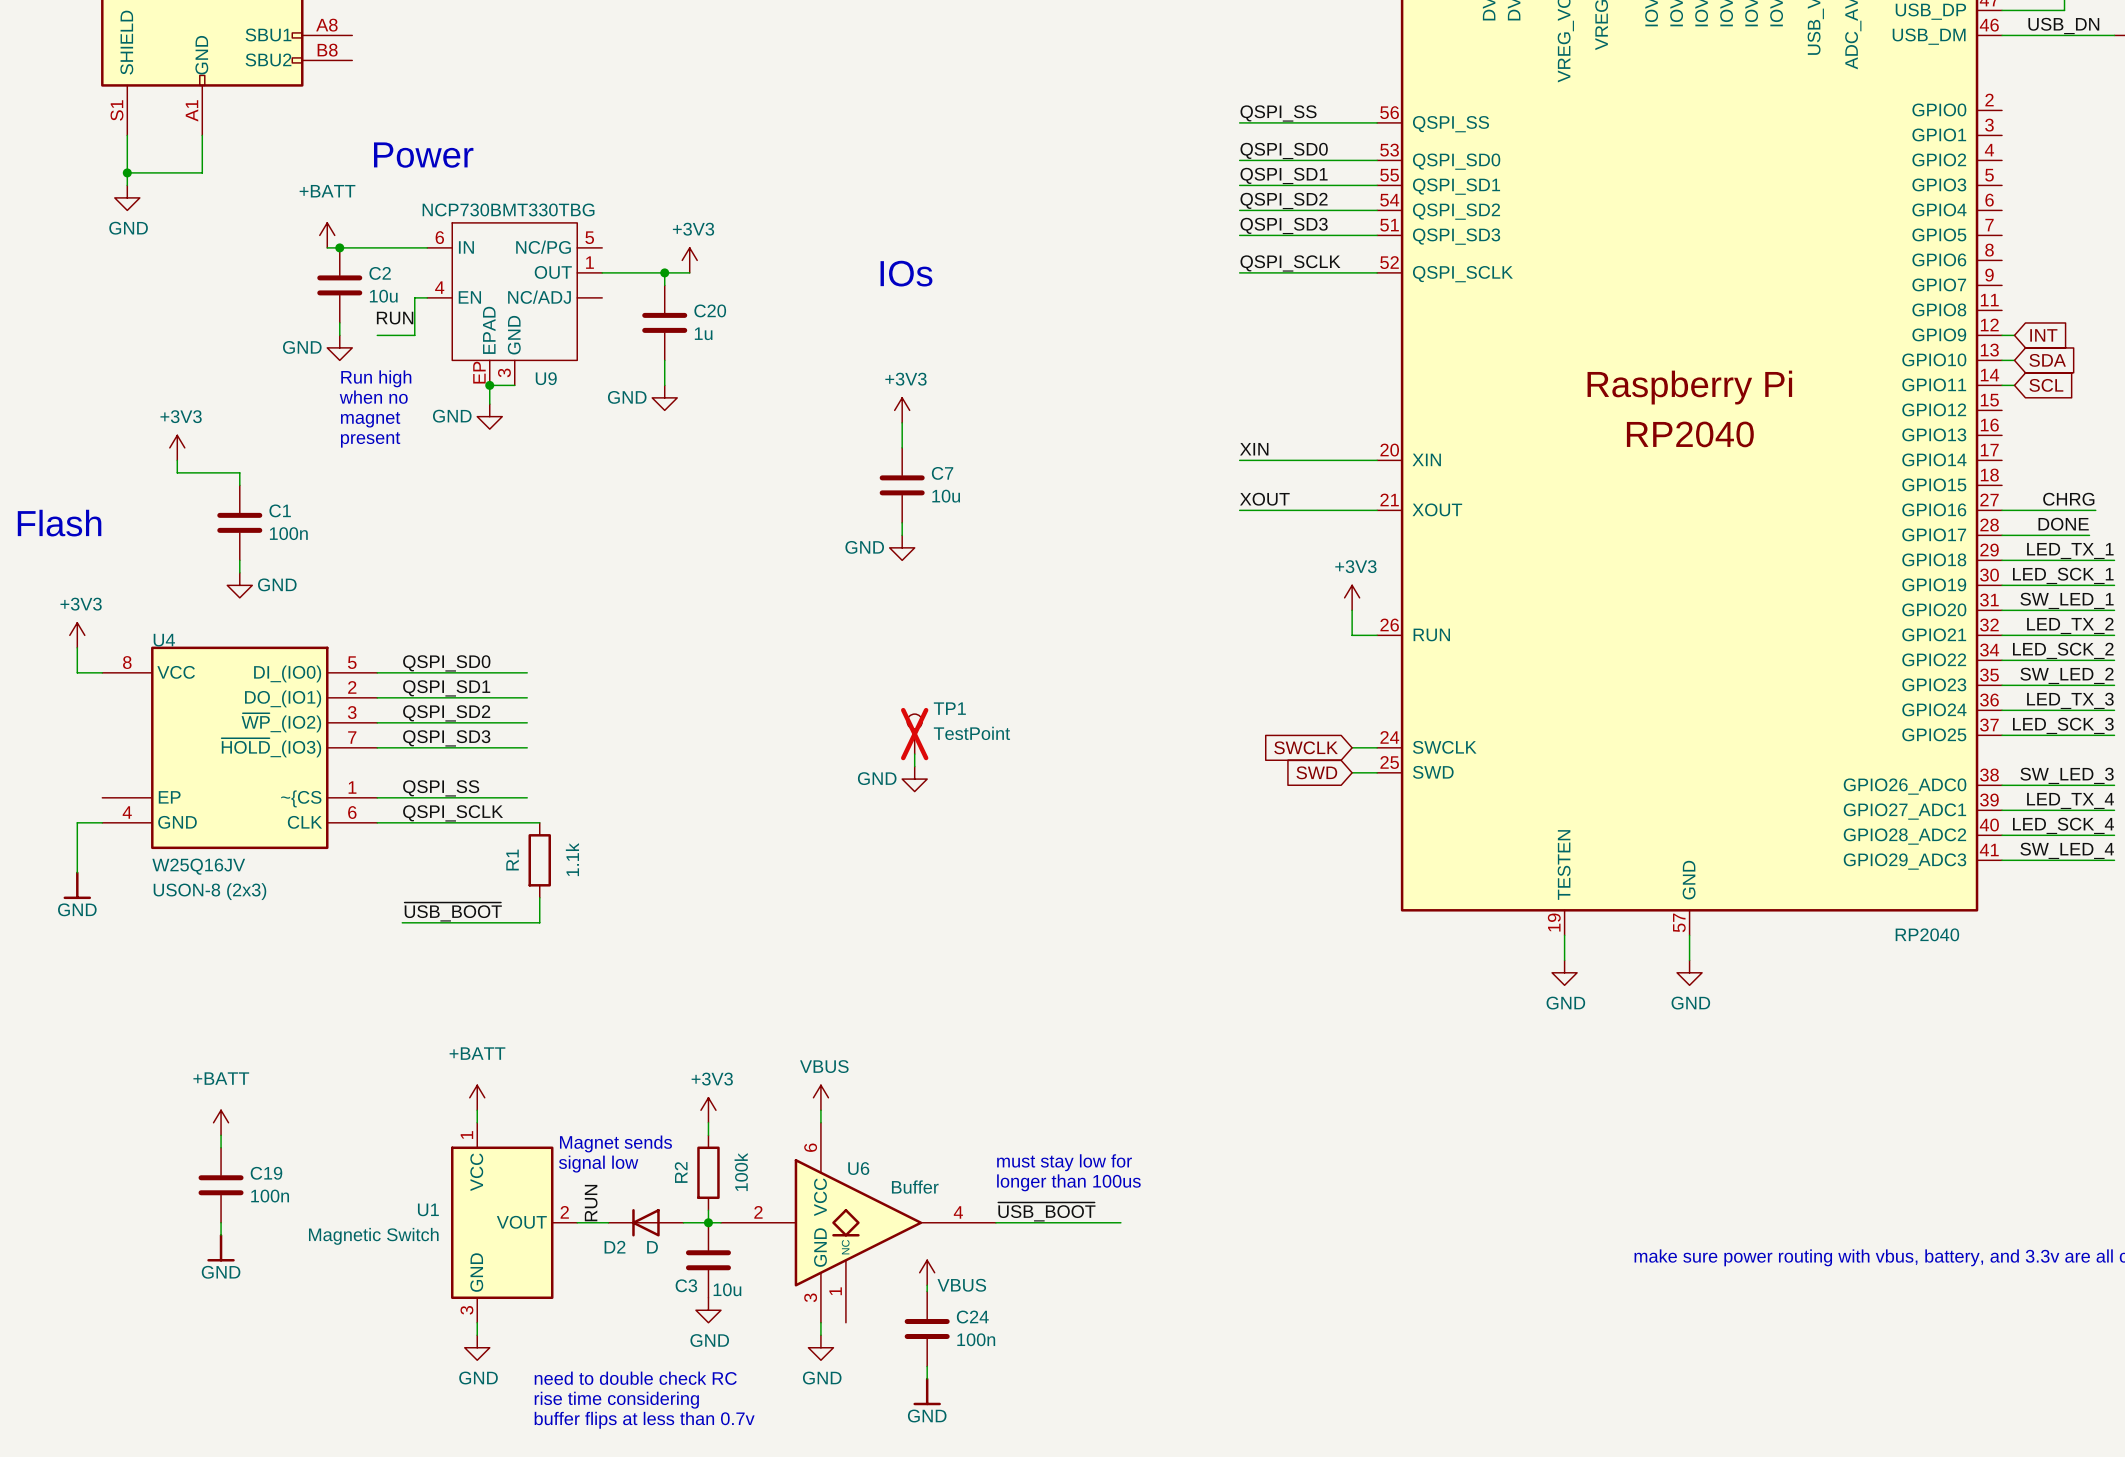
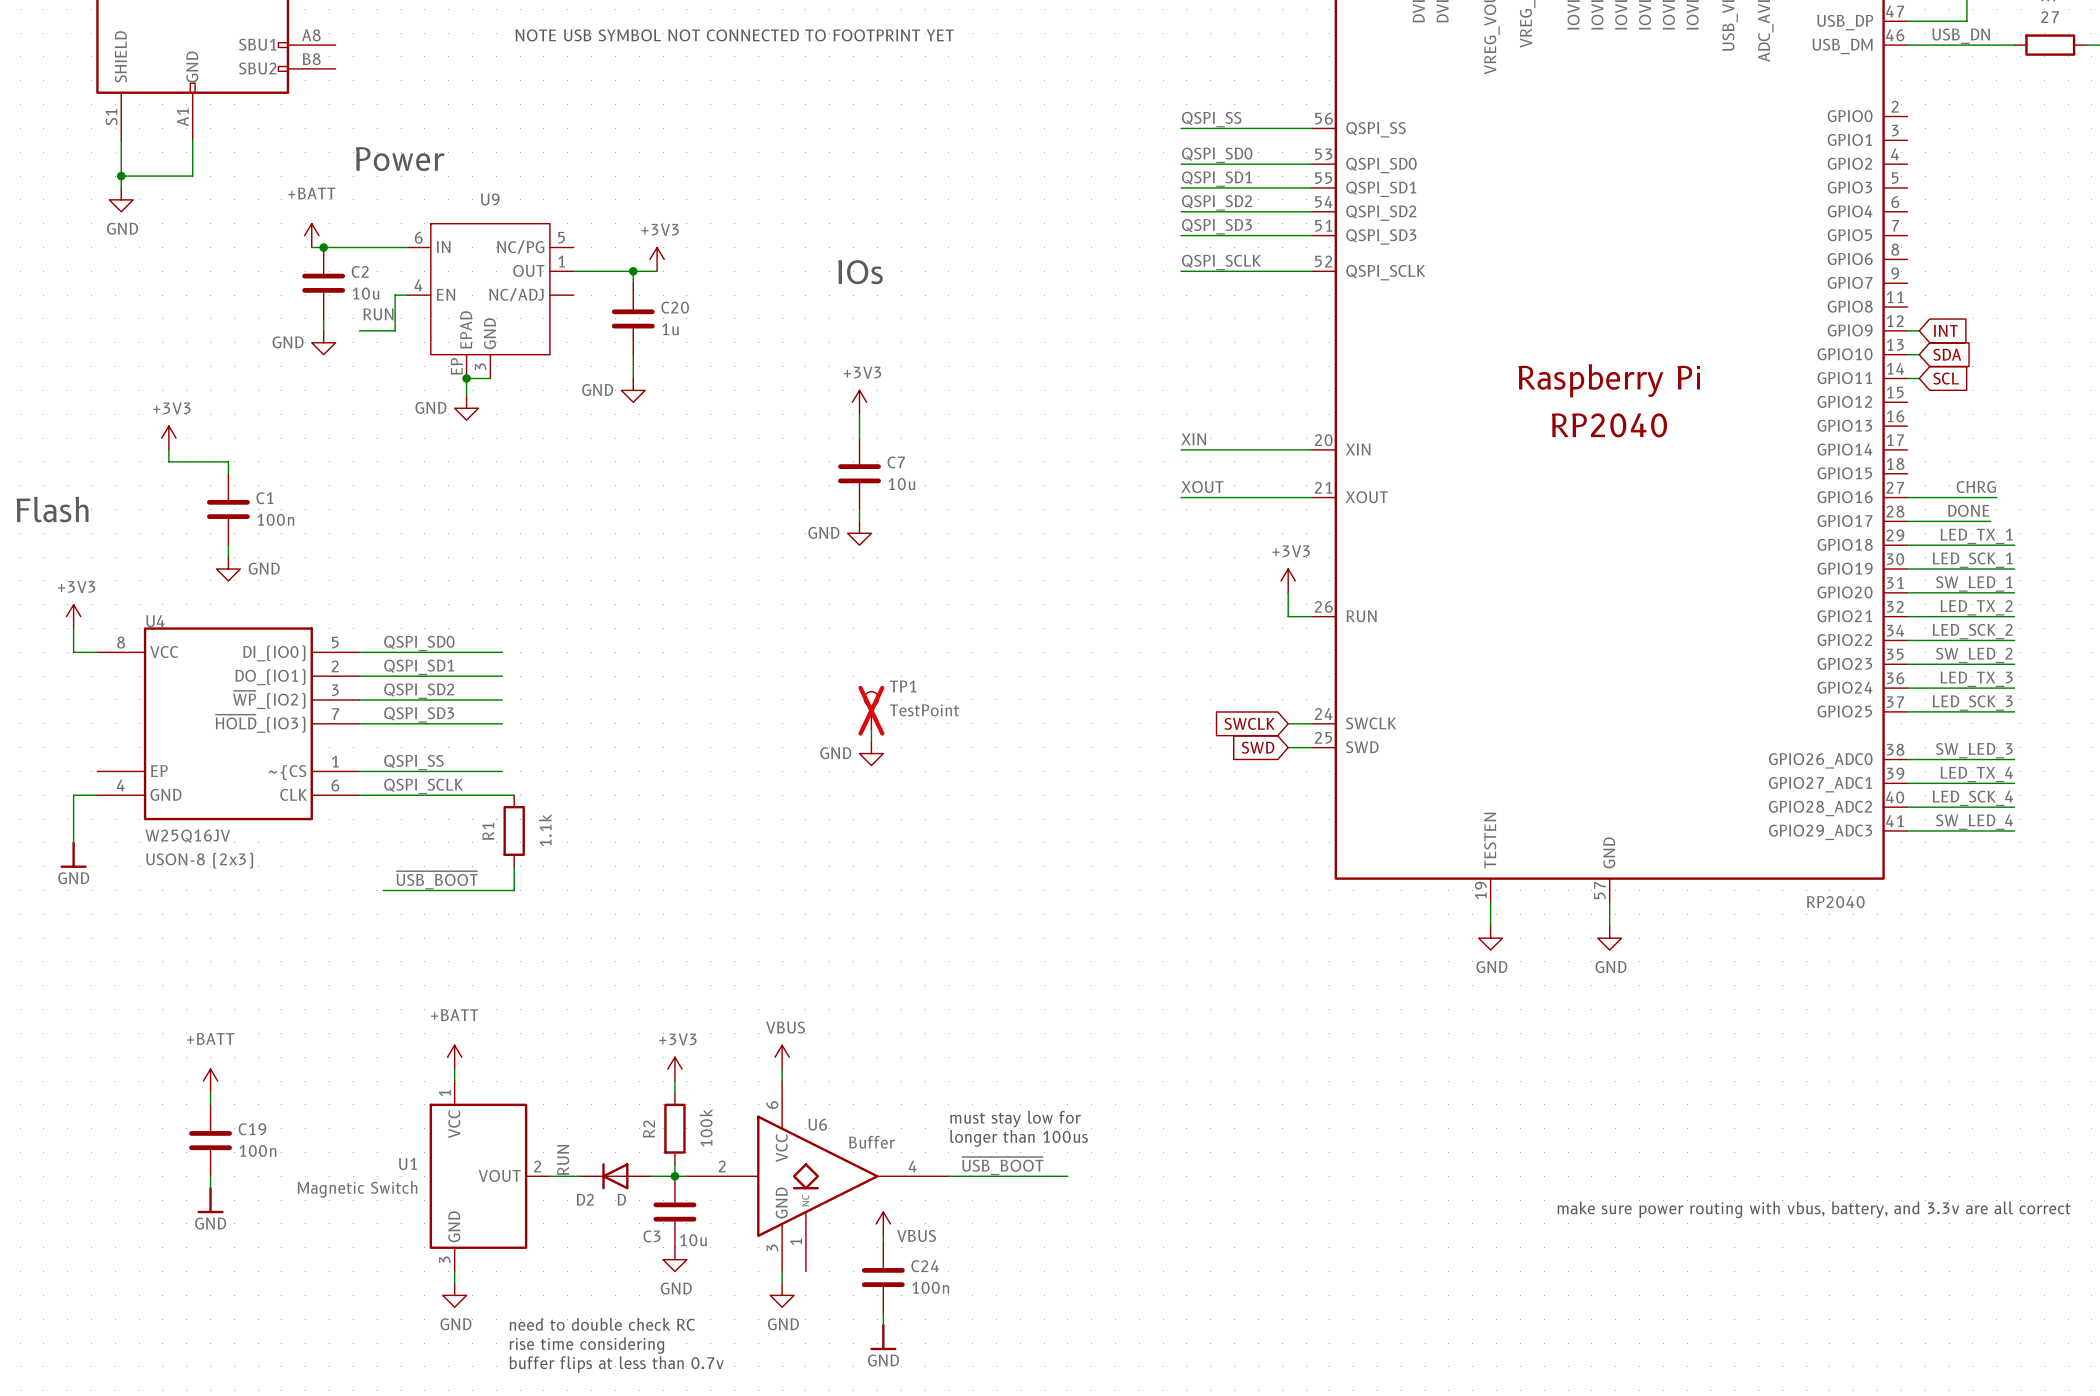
text: none -> NOTE USB SYMBOL NOT CONNECTED TO FOOTPRINT YET (734, 35)
U9 value: NCP730BMT330TBG (508, 209) -> none
text: Run high (376, 378) -> none
U9 name position: U9 (546, 378) -> U9 (490, 199)
text: when no (373, 397) -> none
text: magnet (370, 419) -> none
text: present (370, 439) -> none
text: Magnet sends (615, 1143) -> none
text: signal low (598, 1164) -> none

